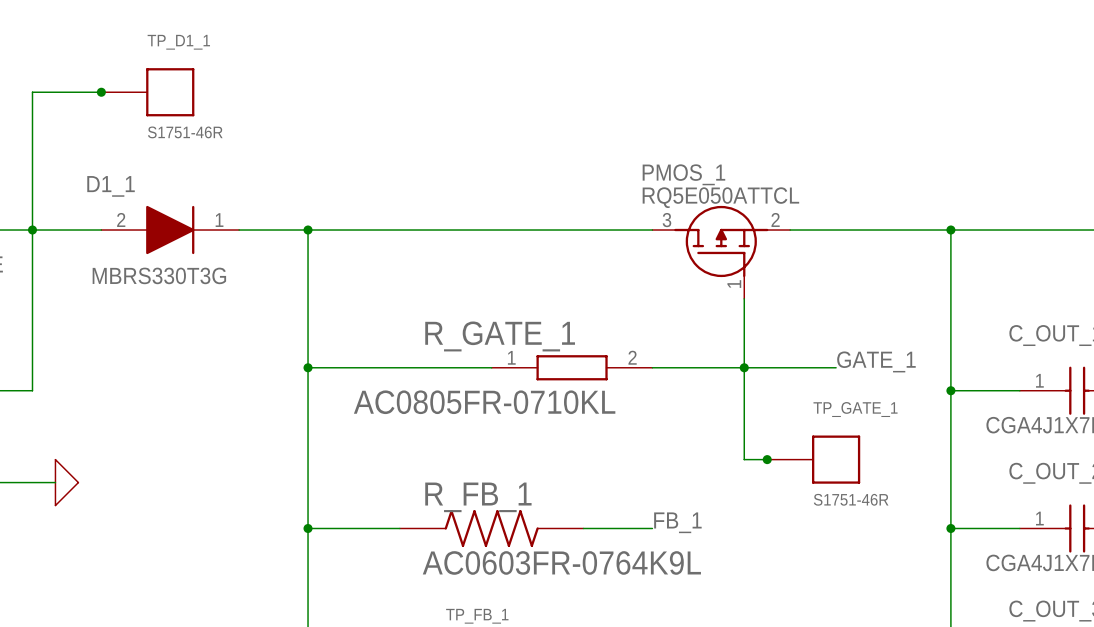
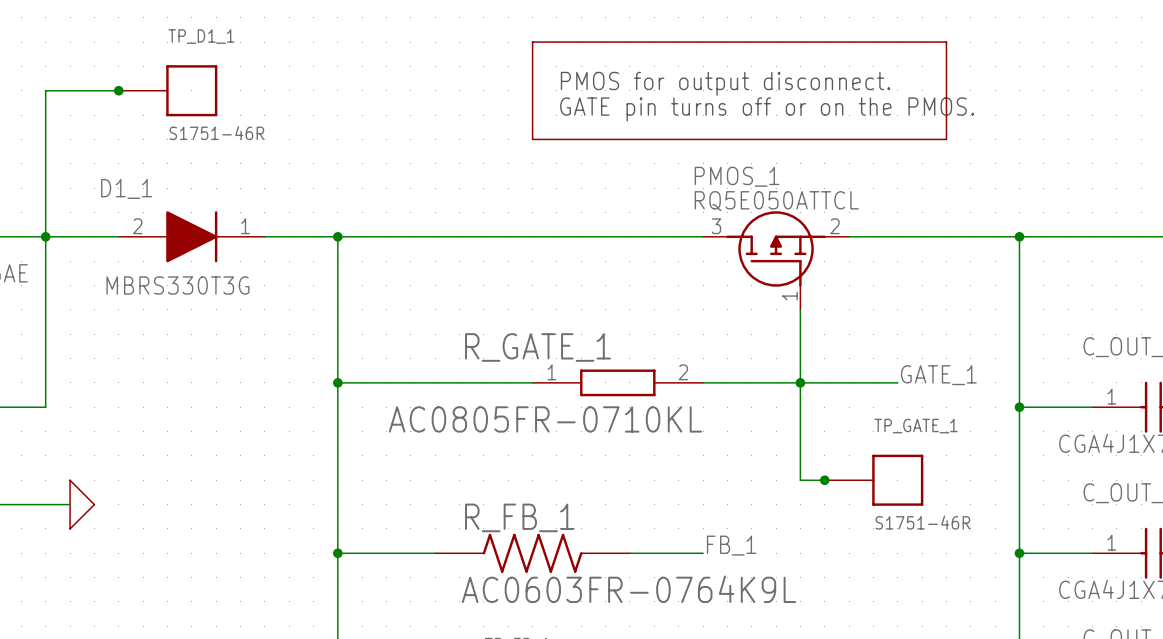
line: none -> (532, 42) (532, 139) (946, 139) (946, 42) (532, 42)
text: none -> PMOS for output disconnect. (725, 83)
text: none -> GATE pin turns off or on the PMOS. (767, 109)

